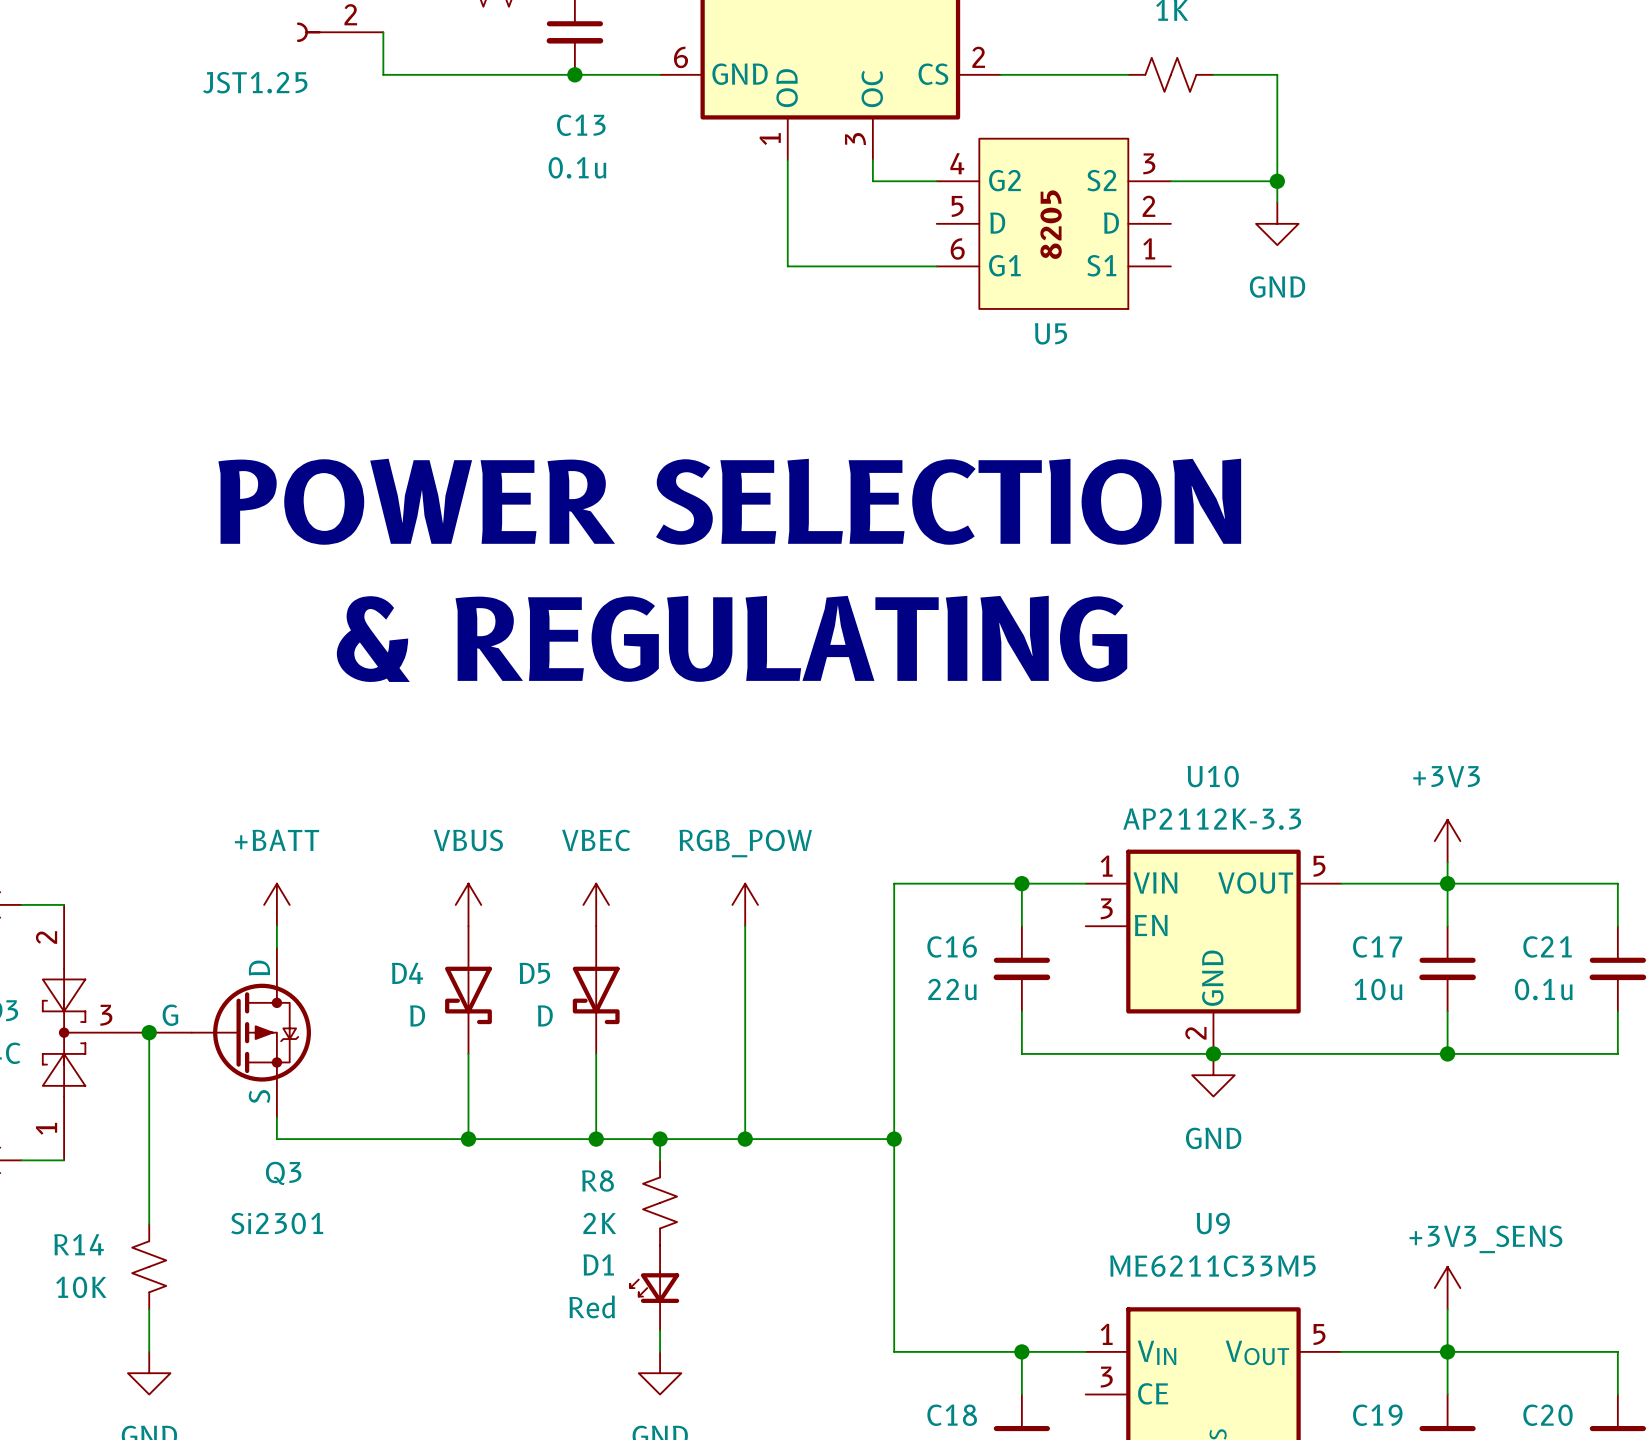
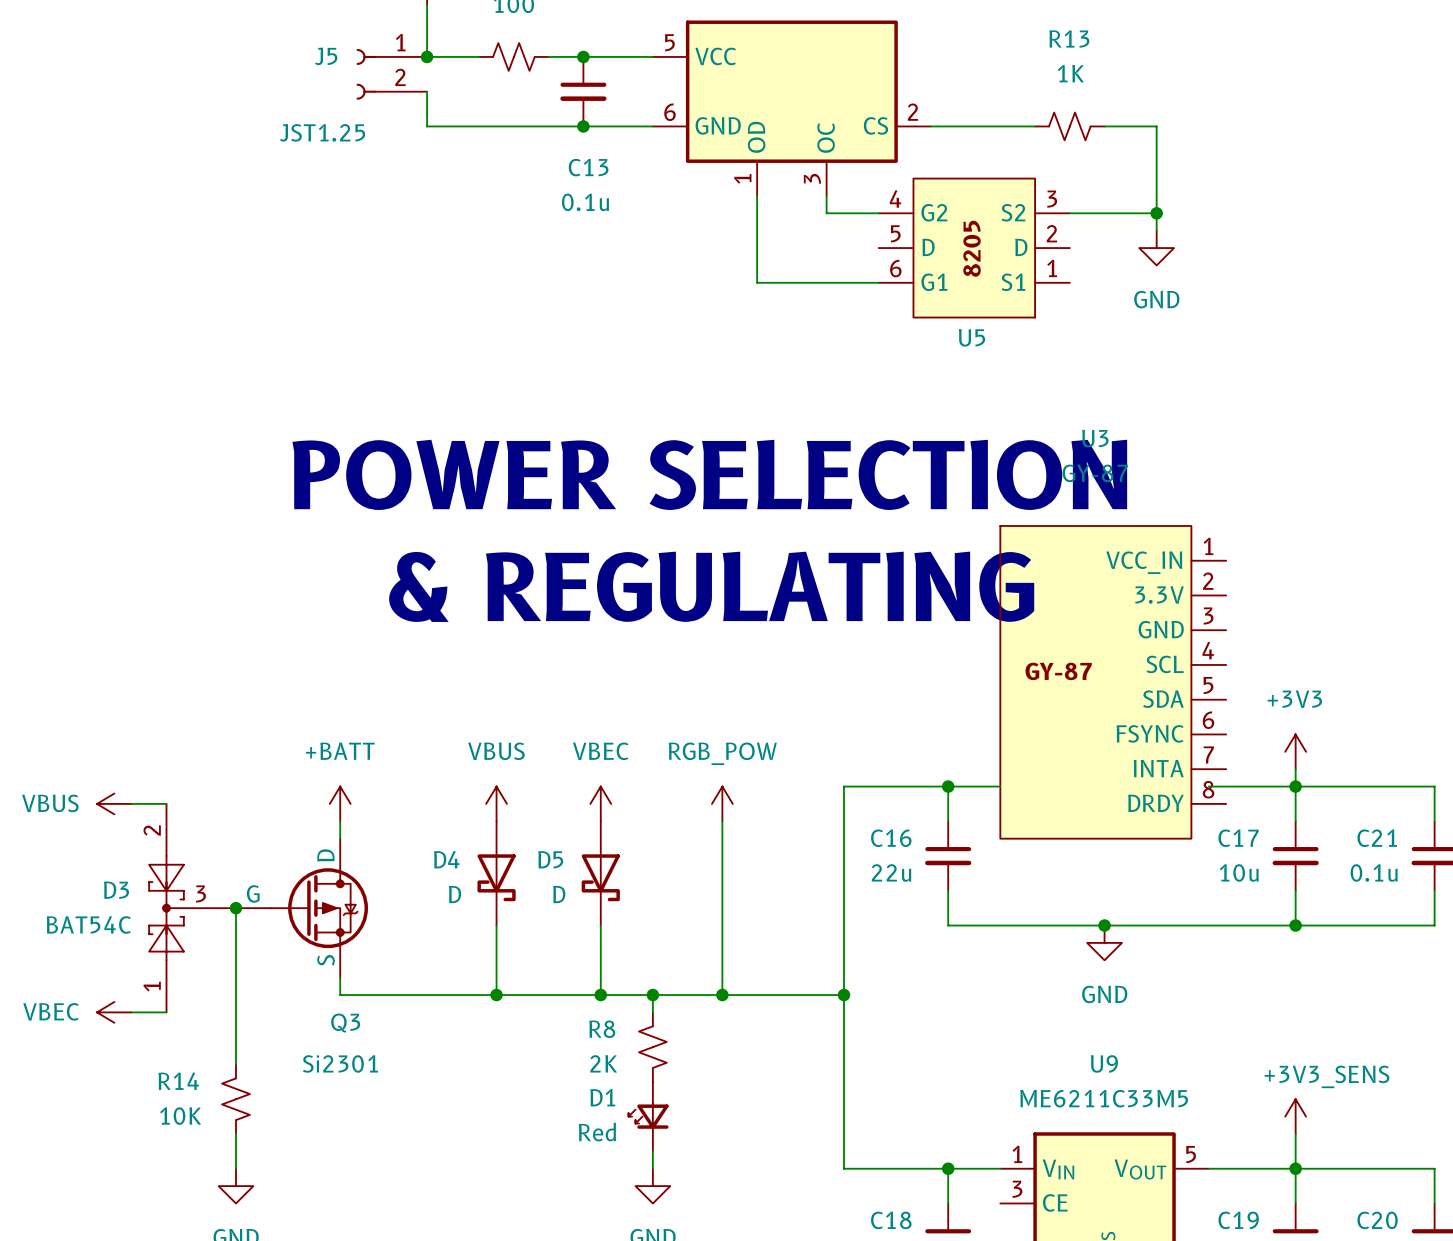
U3: none -> GY-87 (1113, 682)
U10: AP2112K-3.3 (1213, 951) -> none

